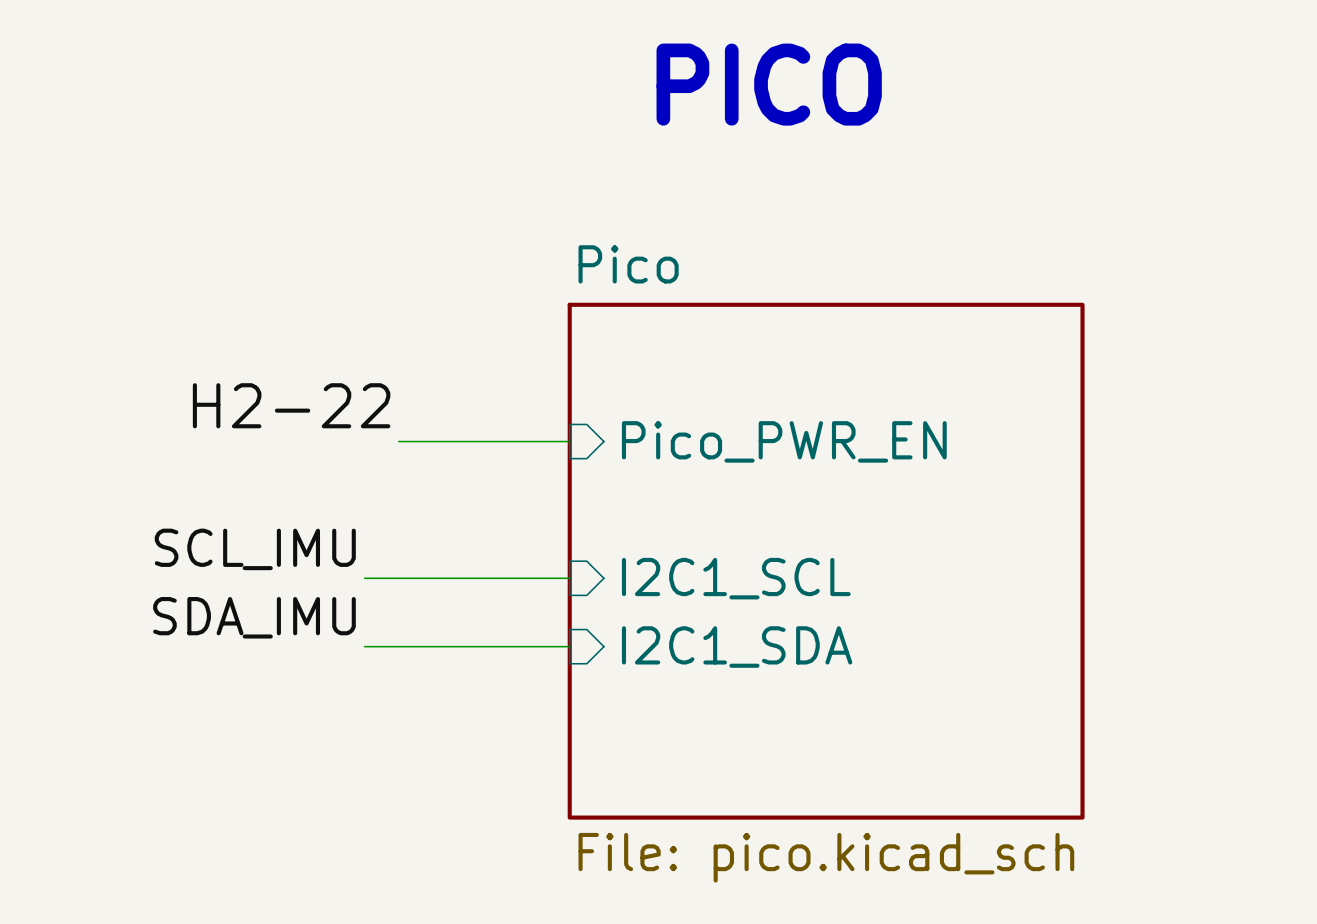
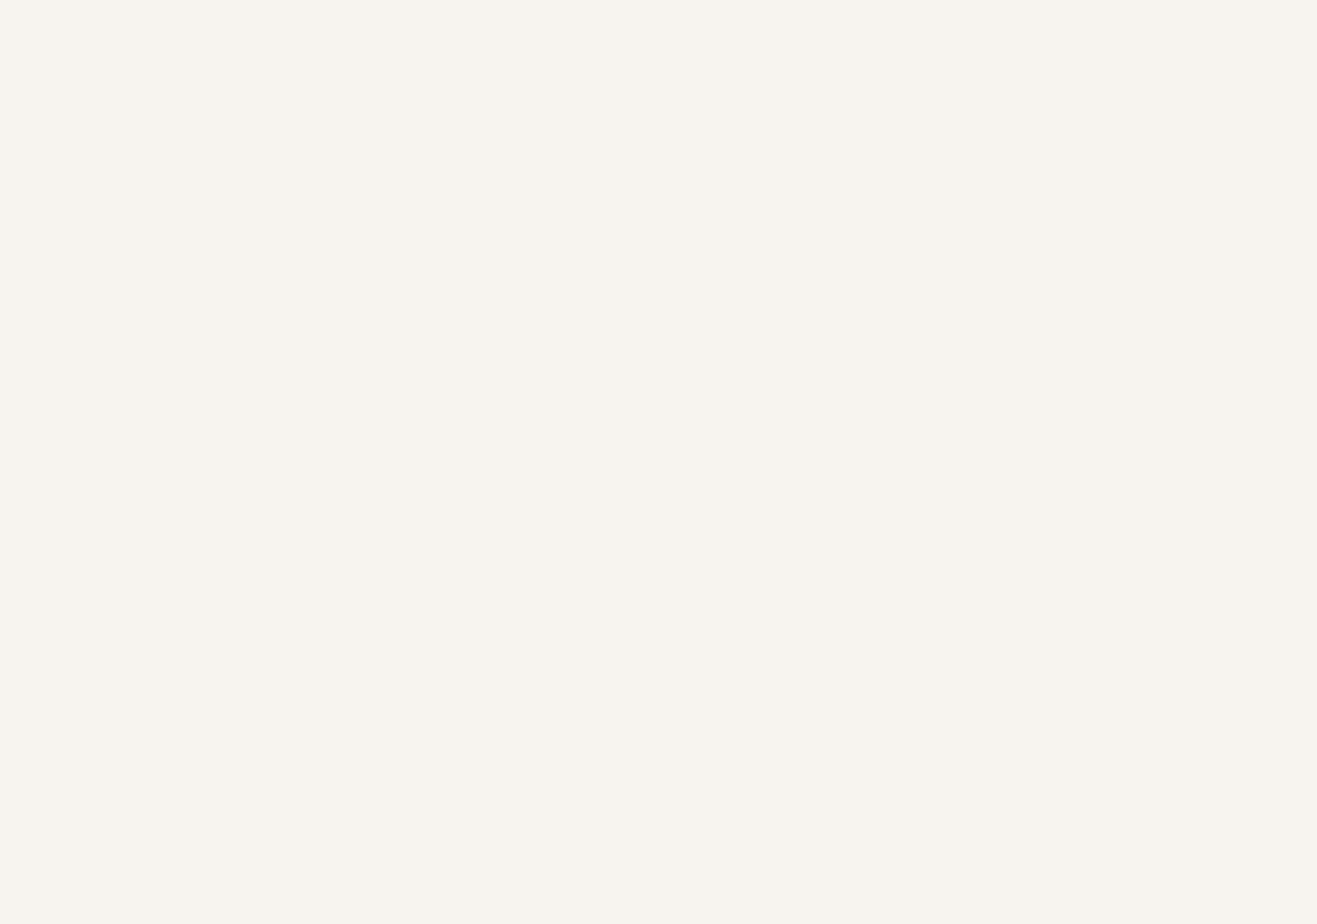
text: PICO (769, 84) -> none
label: H2-22 (291, 405) -> none
wire: (398, 441) (569, 441) -> none
sheet pin: Pico_PWR_EN (784, 441) -> none
label: SCL_IMU (255, 549) -> none
sheet Pico: File: pico.kicad_sch (826, 561) -> none
wire: (364, 578) (569, 578) -> none
sheet pin: I2C1_SCL (736, 578) -> none
label: SDA_IMU (254, 617) -> none
wire: (364, 646) (569, 646) -> none
sheet pin: I2C1_SDA (737, 647) -> none

